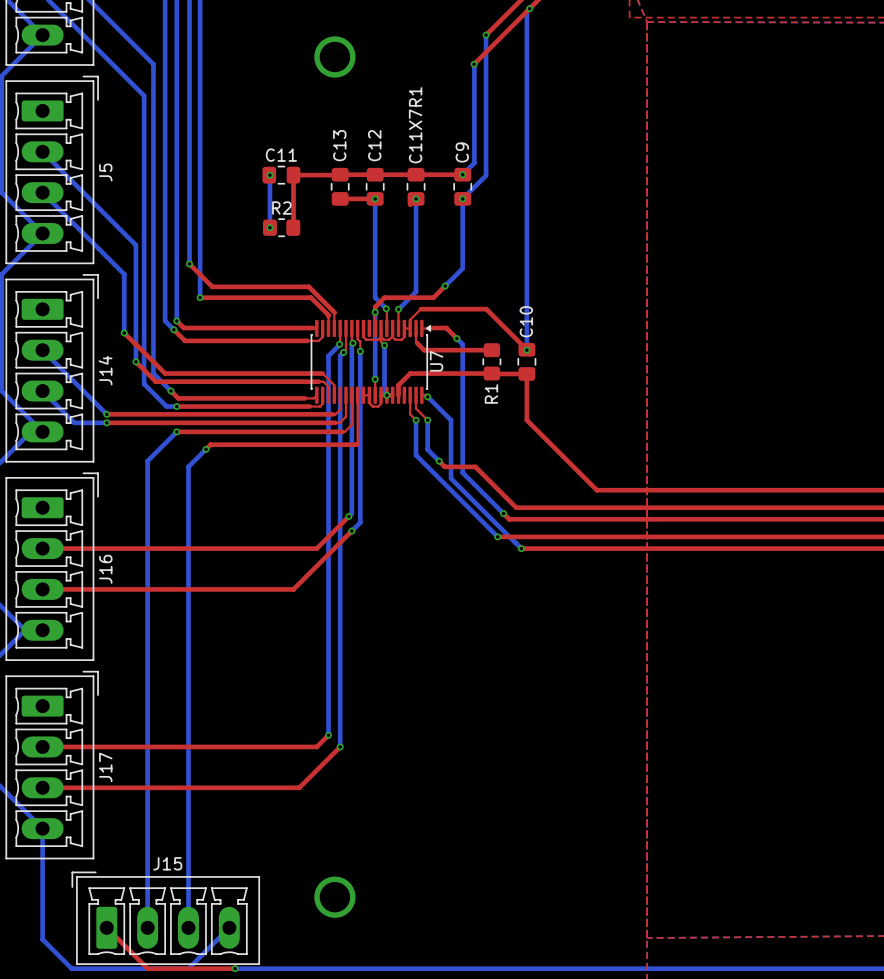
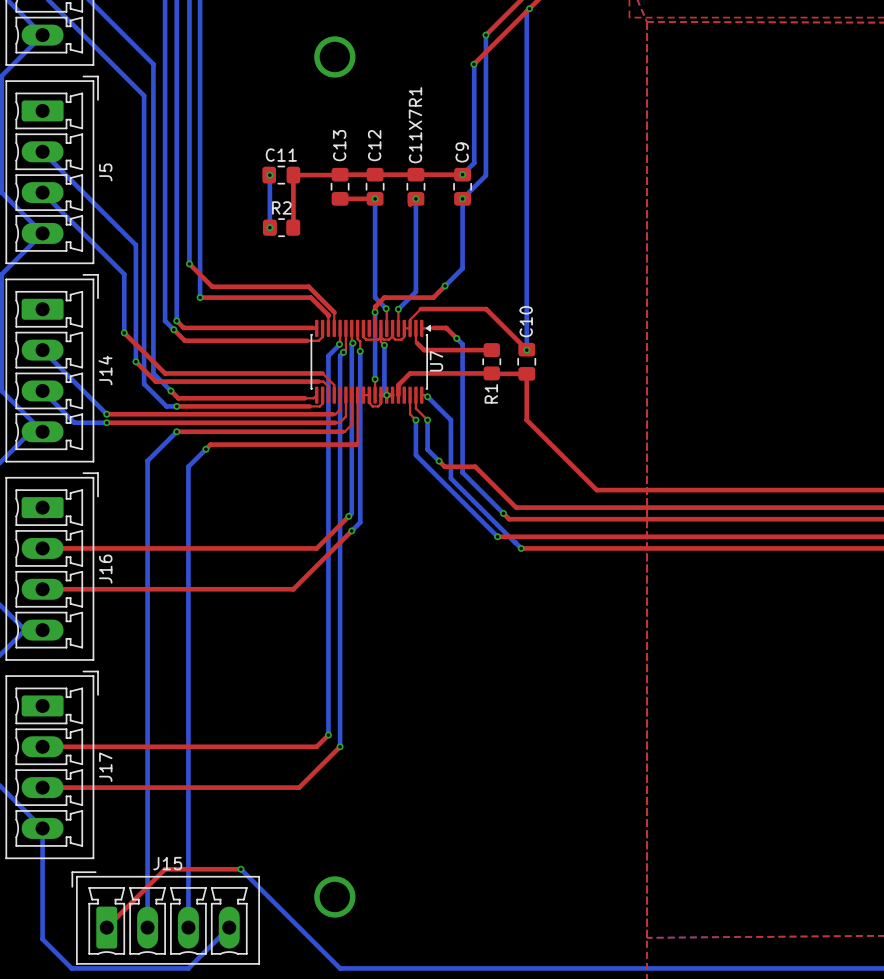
via: none -> (240, 869)
top track: (106, 927) (147, 968) (235, 968) -> (106, 927) (165, 869) (240, 869)
bottom track: (235, 968) (340, 968) -> (240, 869) (340, 968)
via: (235, 968) -> none

